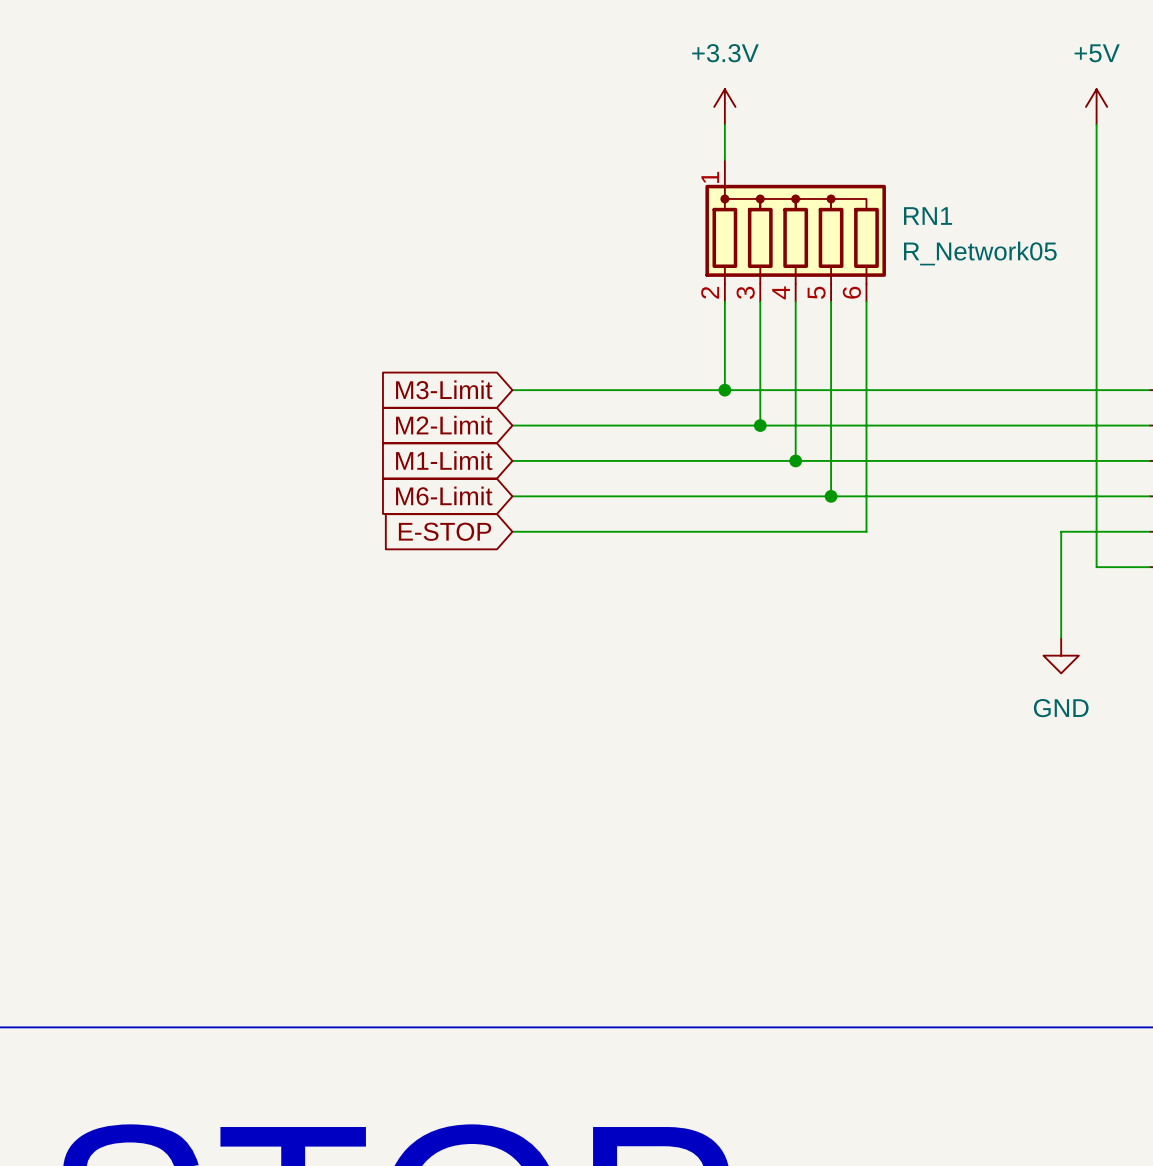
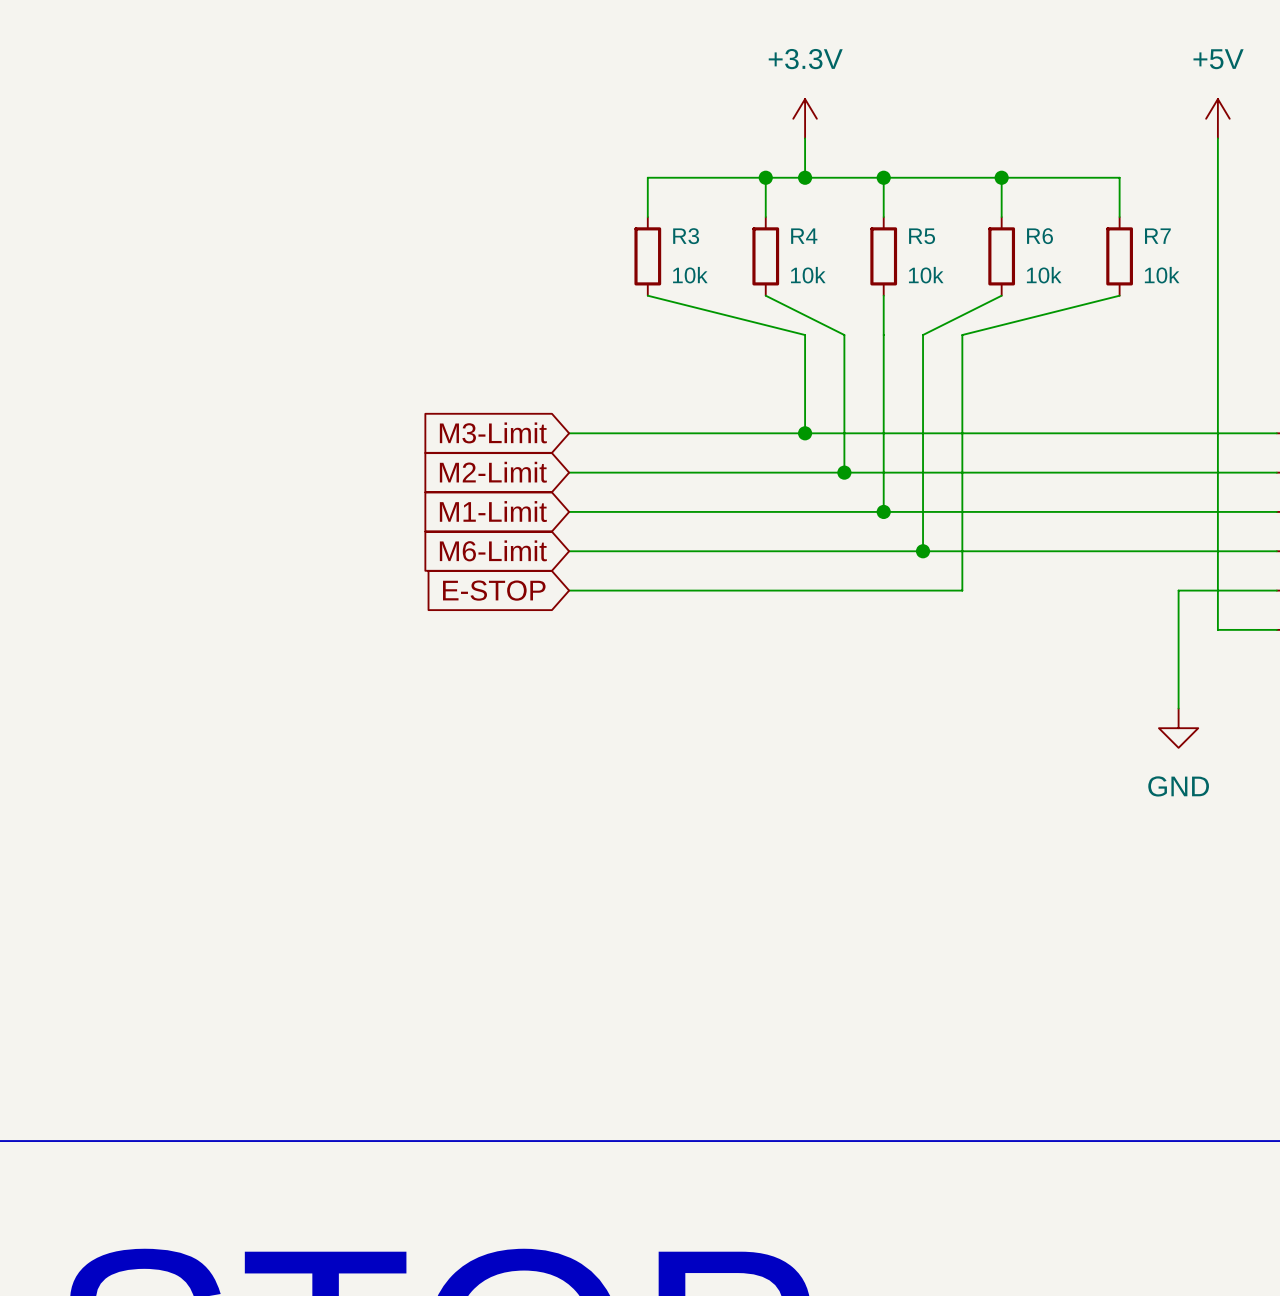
wire: none -> (765, 177) (765, 217)
junction: none -> (765, 177)
junction: none -> (805, 177)
wire: none -> (883, 177) (883, 217)
junction: none -> (883, 177)
wire: none -> (1001, 177) (1001, 217)
junction: none -> (1001, 177)
wire: none -> (647, 217) (647, 177) (1119, 177) (1119, 217)
R3: none -> 10k (647, 256)
R4: none -> 10k (765, 256)
RN1: R_Network05 (795, 230) -> none
R5: none -> 10k (883, 256)
R6: none -> 10k (1001, 256)
R7: none -> 10k (1119, 256)
wire: none -> (647, 295) (805, 335)
wire: none -> (765, 295) (844, 335)
wire: none -> (1001, 295) (923, 335)
wire: none -> (1119, 295) (962, 335)

